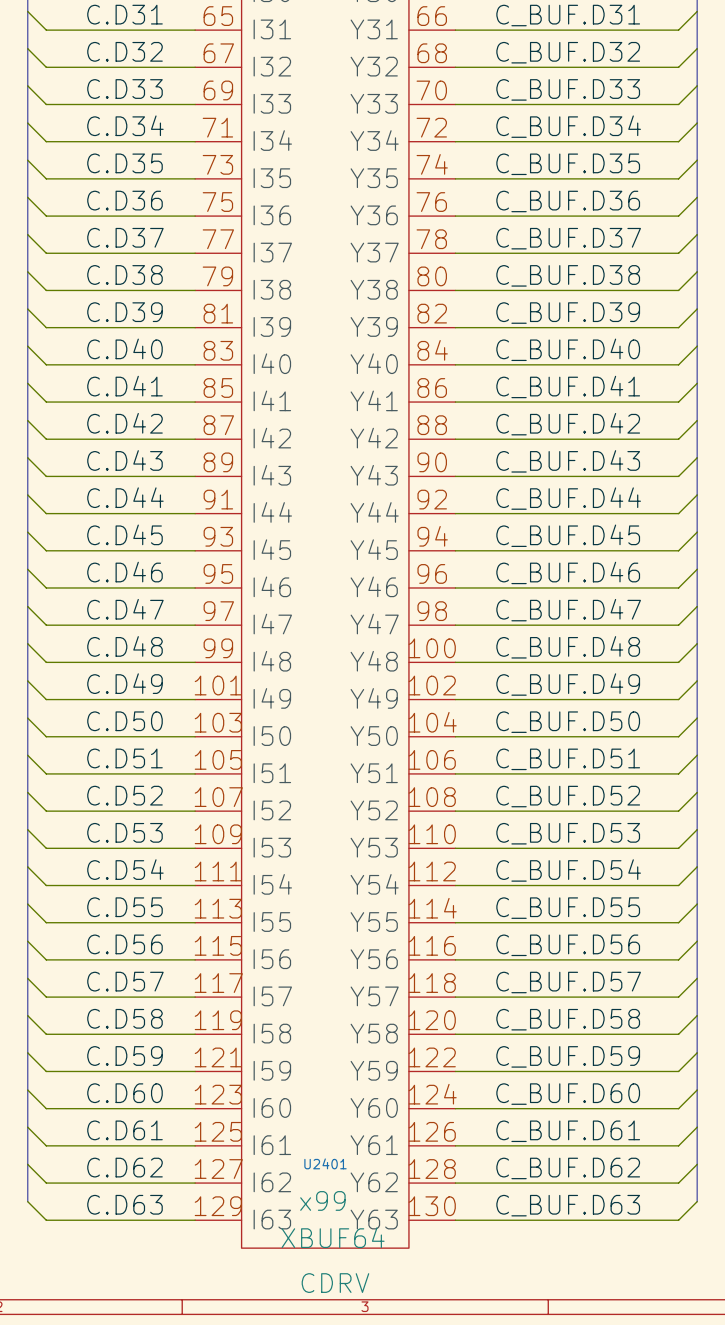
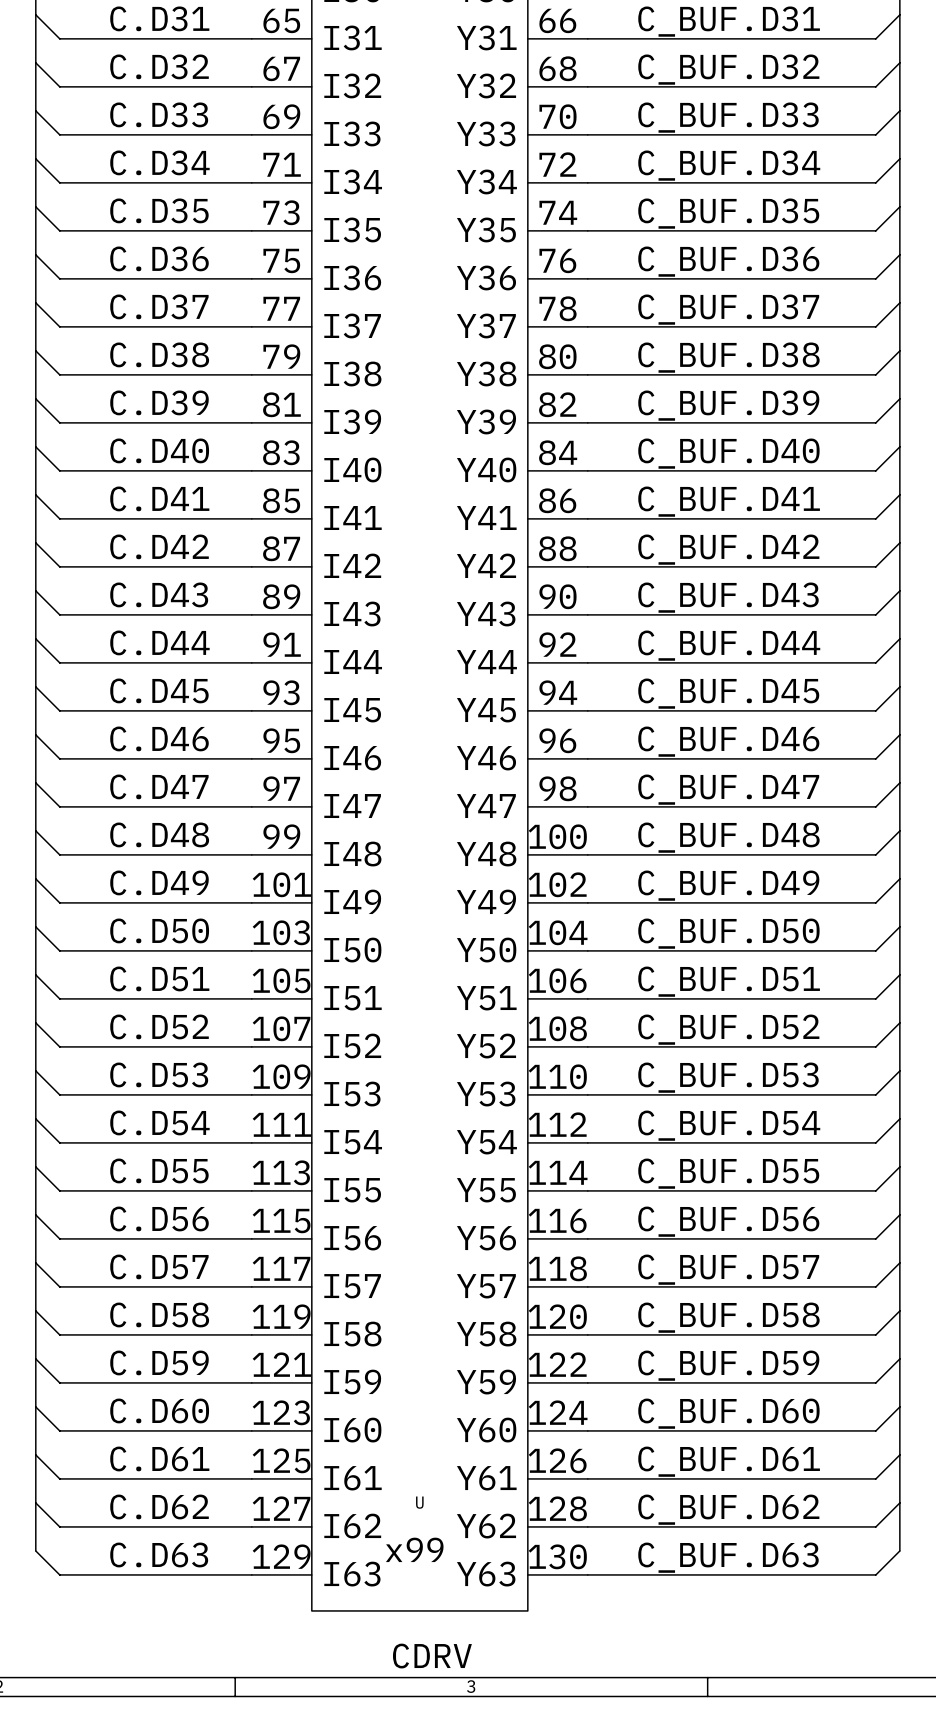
U2401 name: U2401 (325, 1163) -> U (419, 1502)
U2401 value: XBUF64 (333, 1237) -> none

